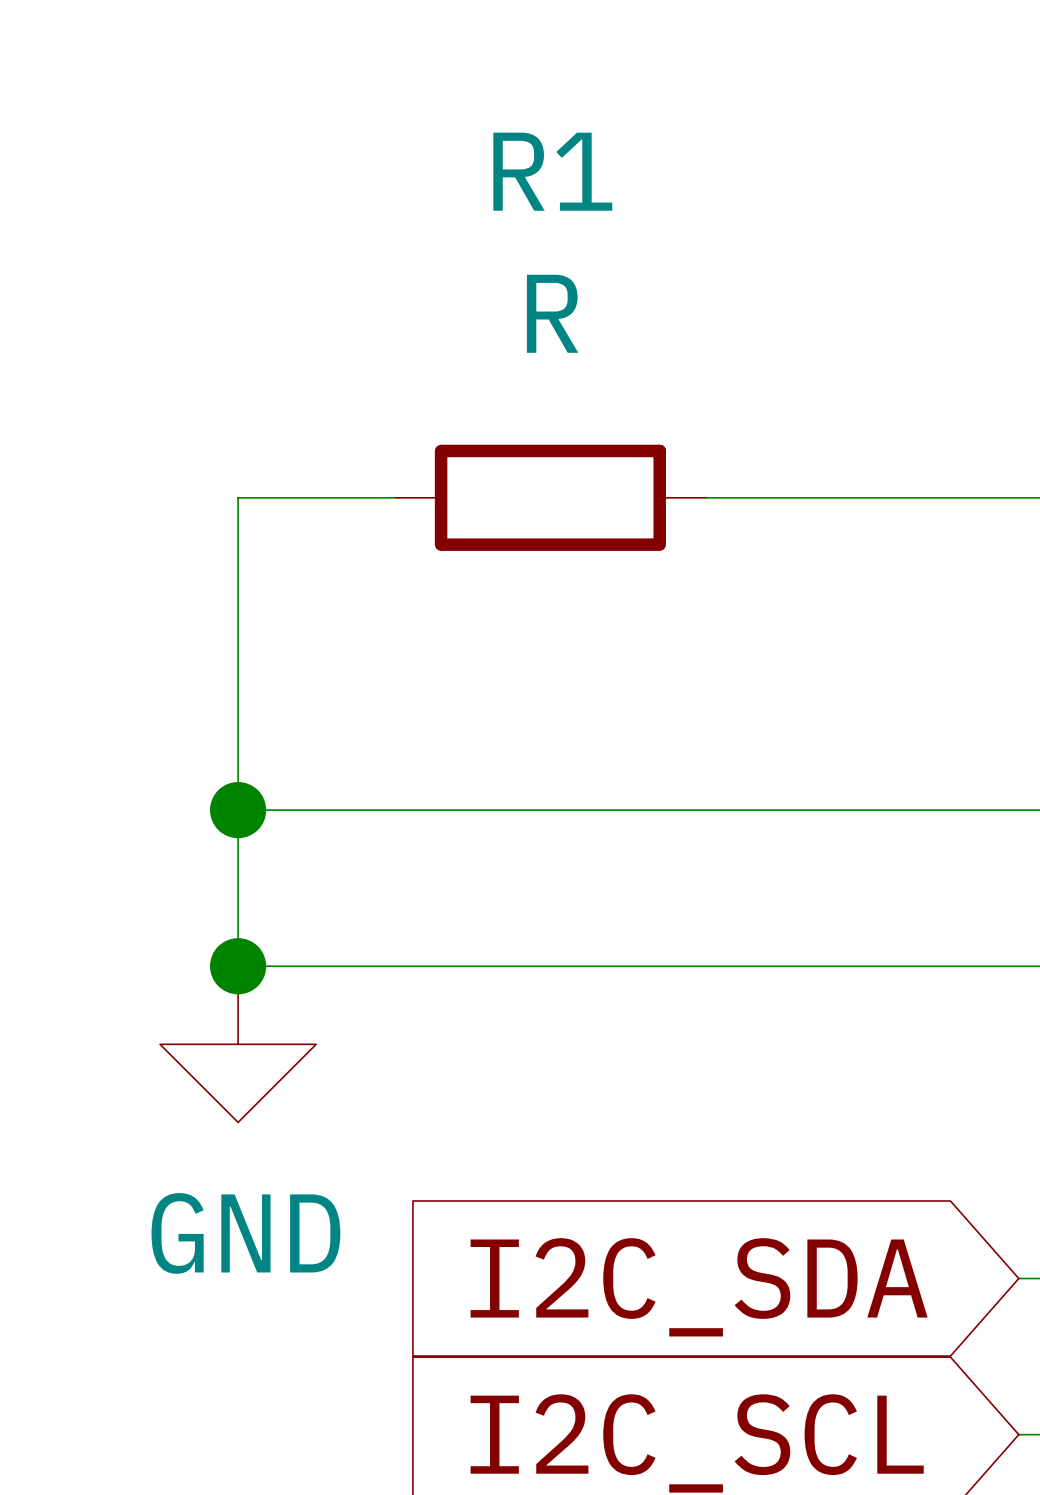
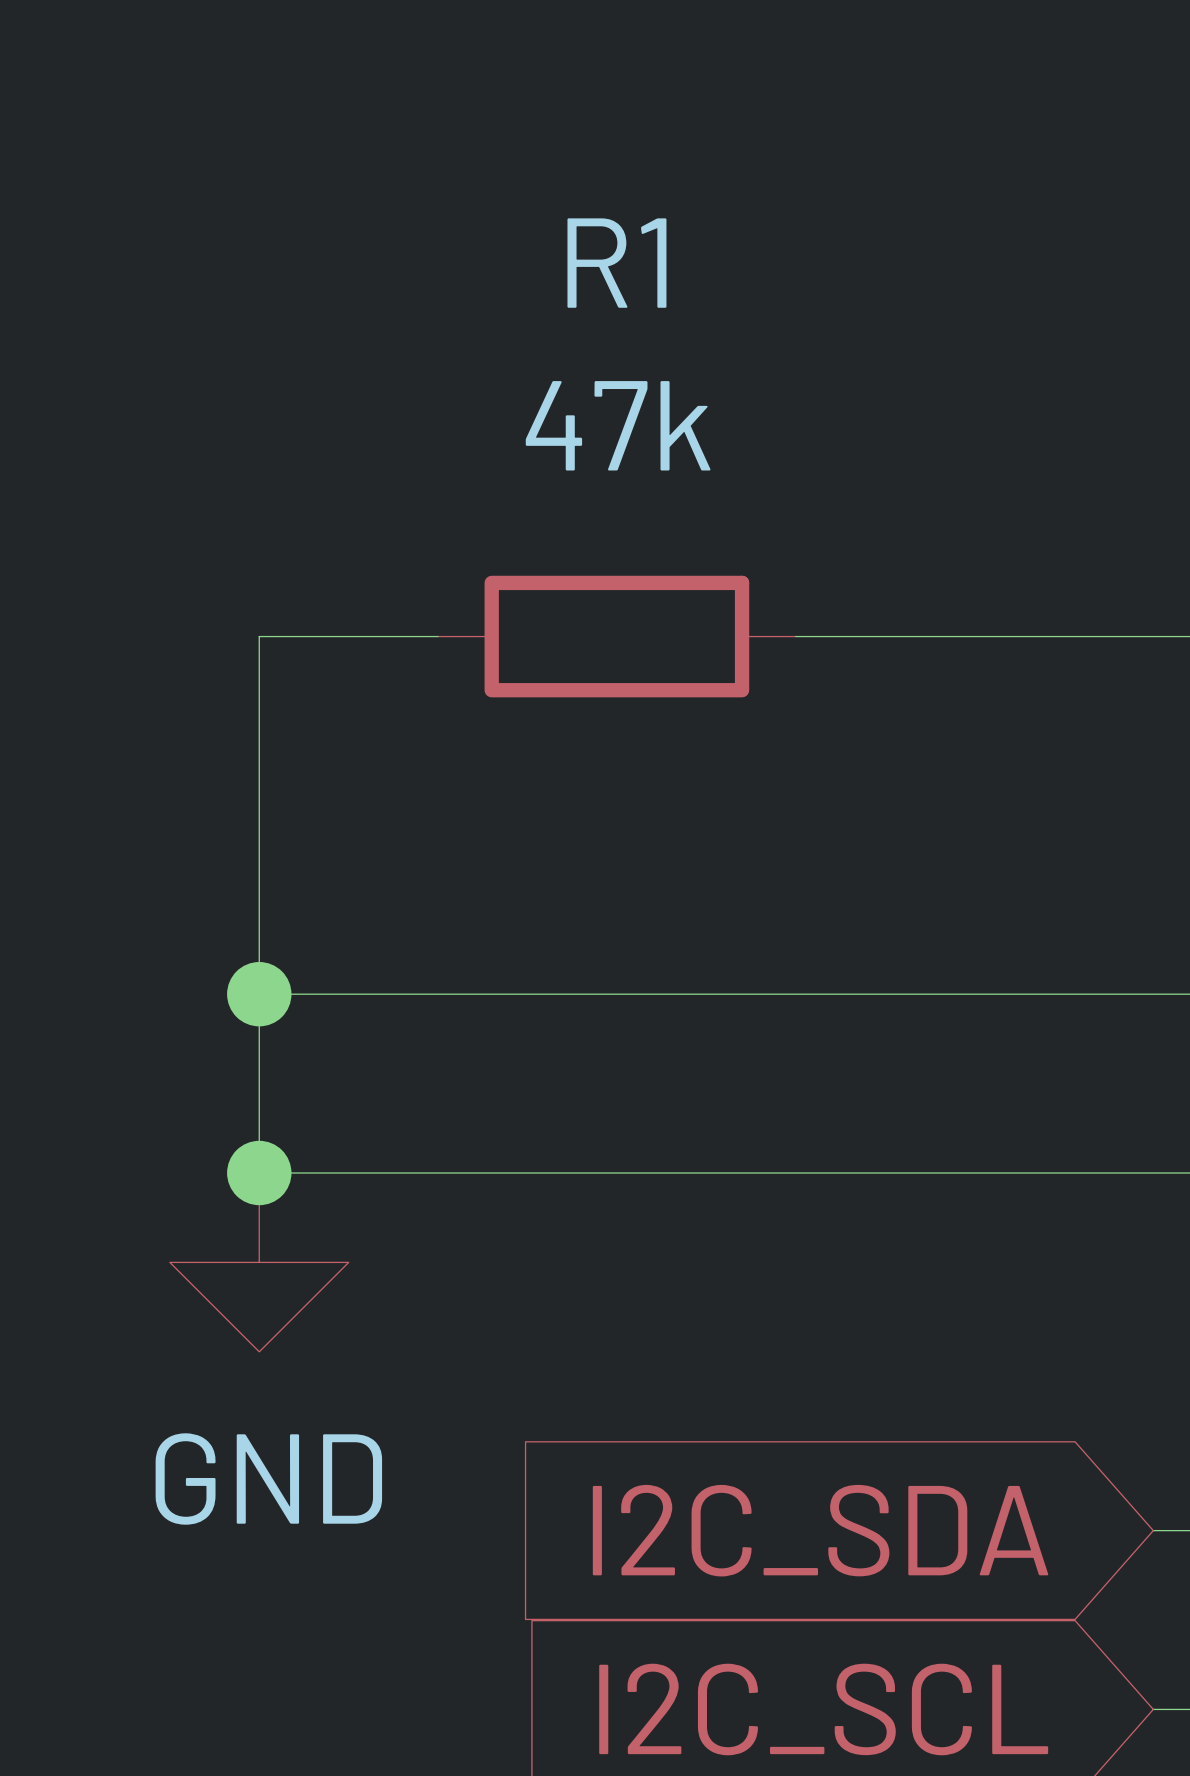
R1 value: R (552, 313) -> 47k (618, 425)

